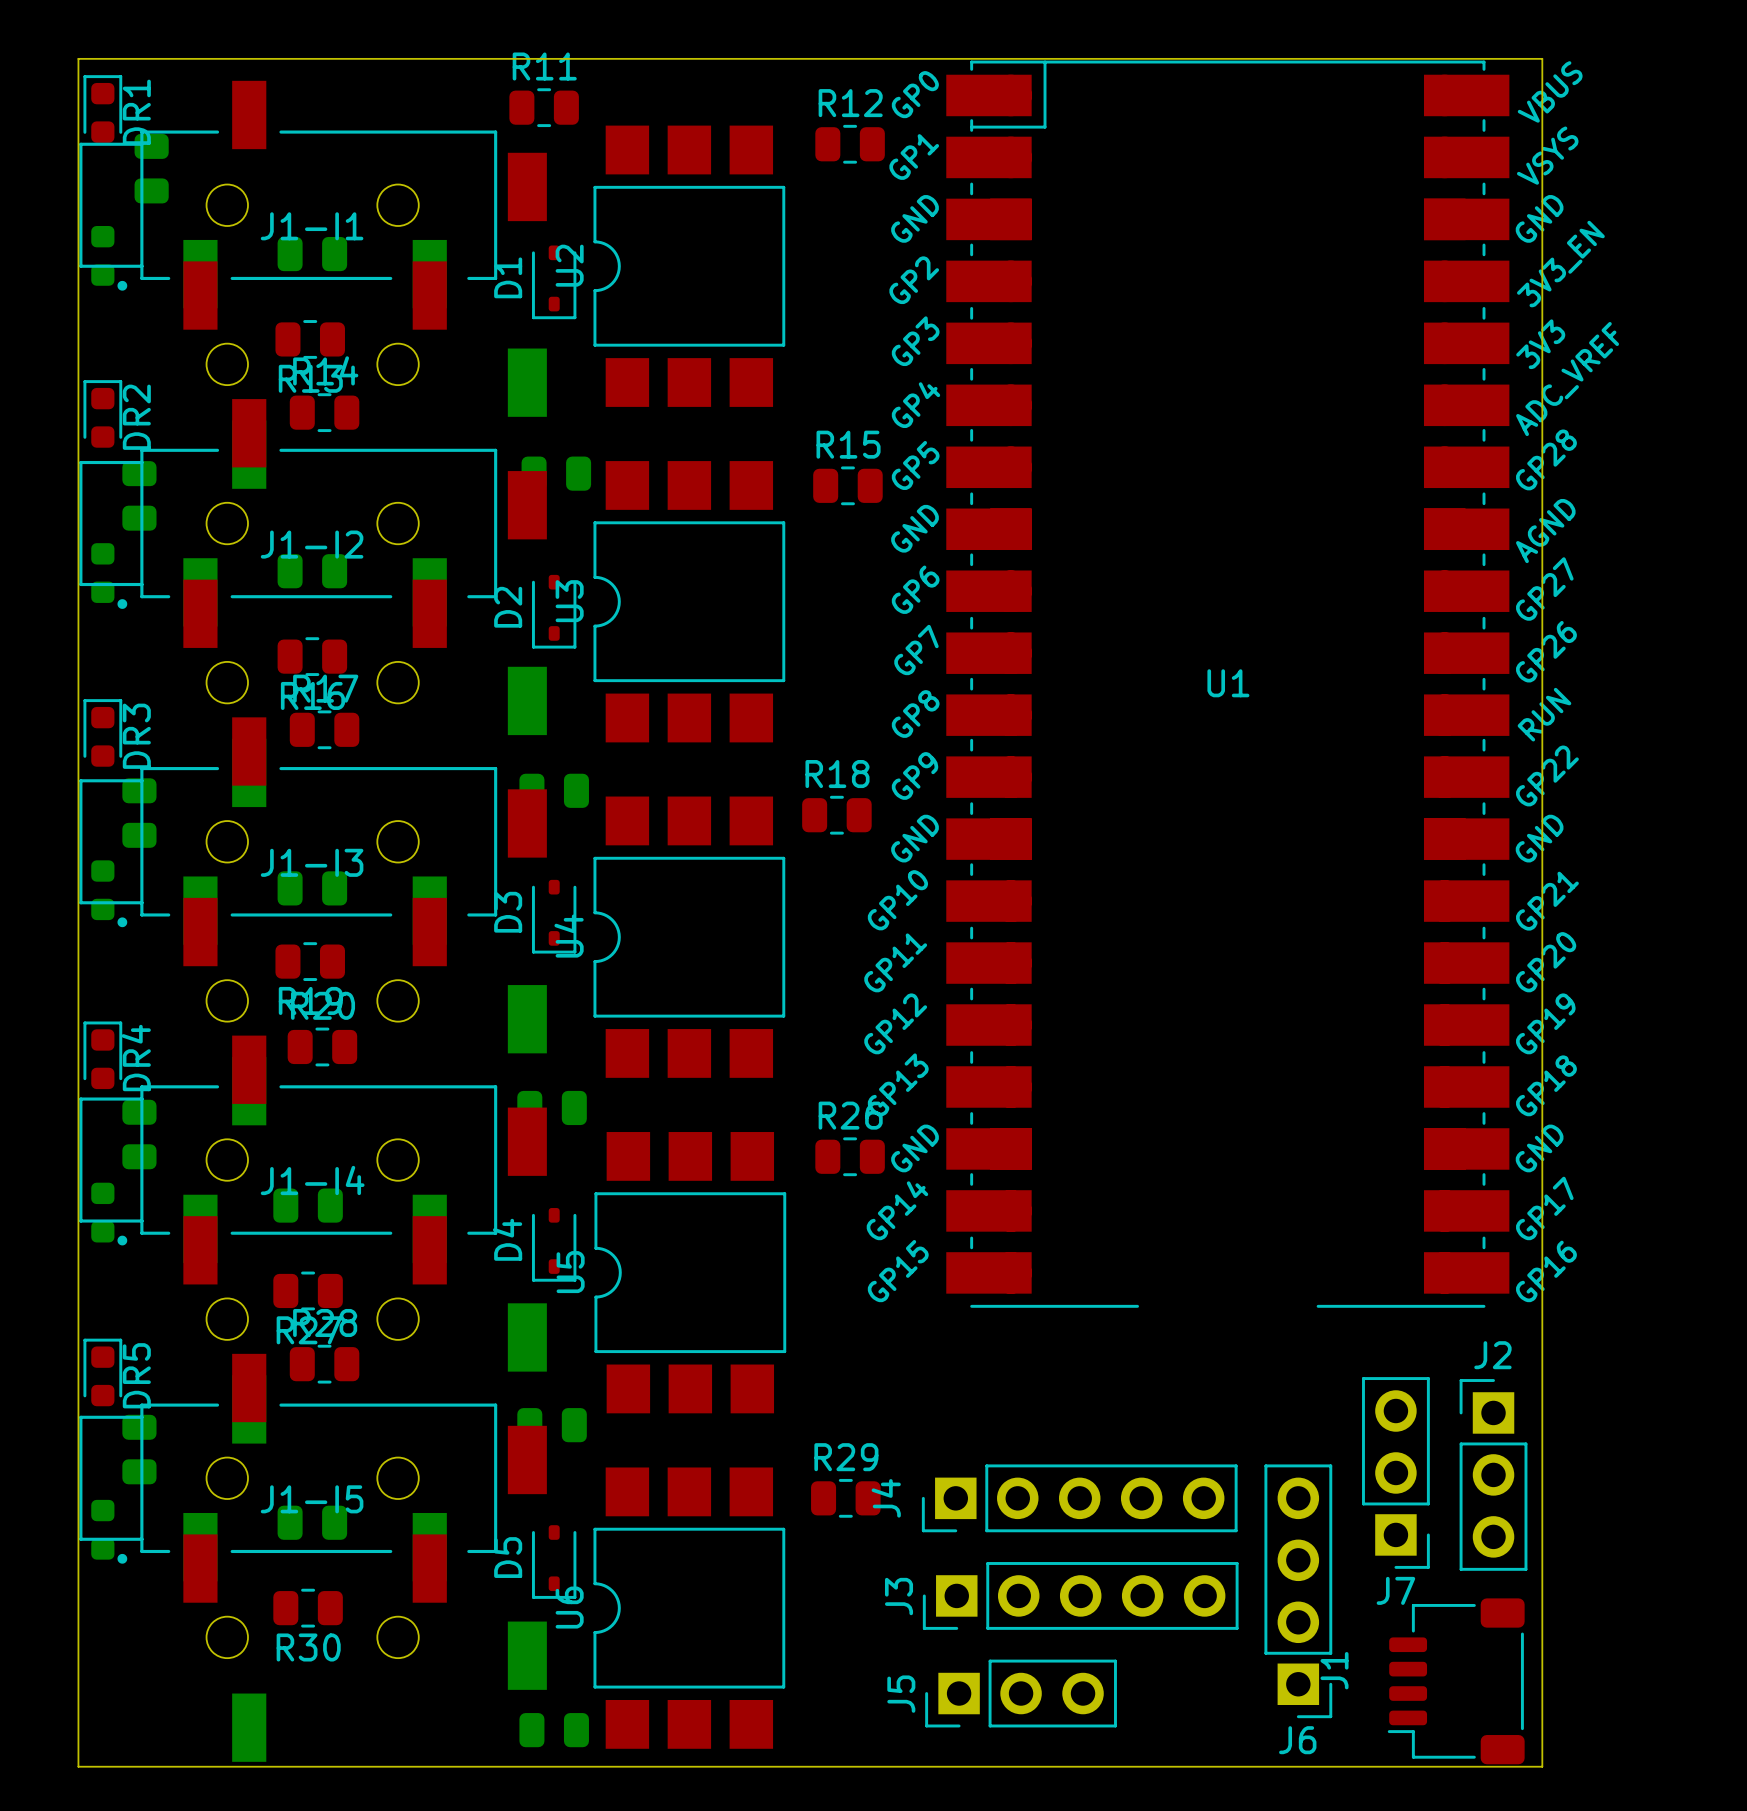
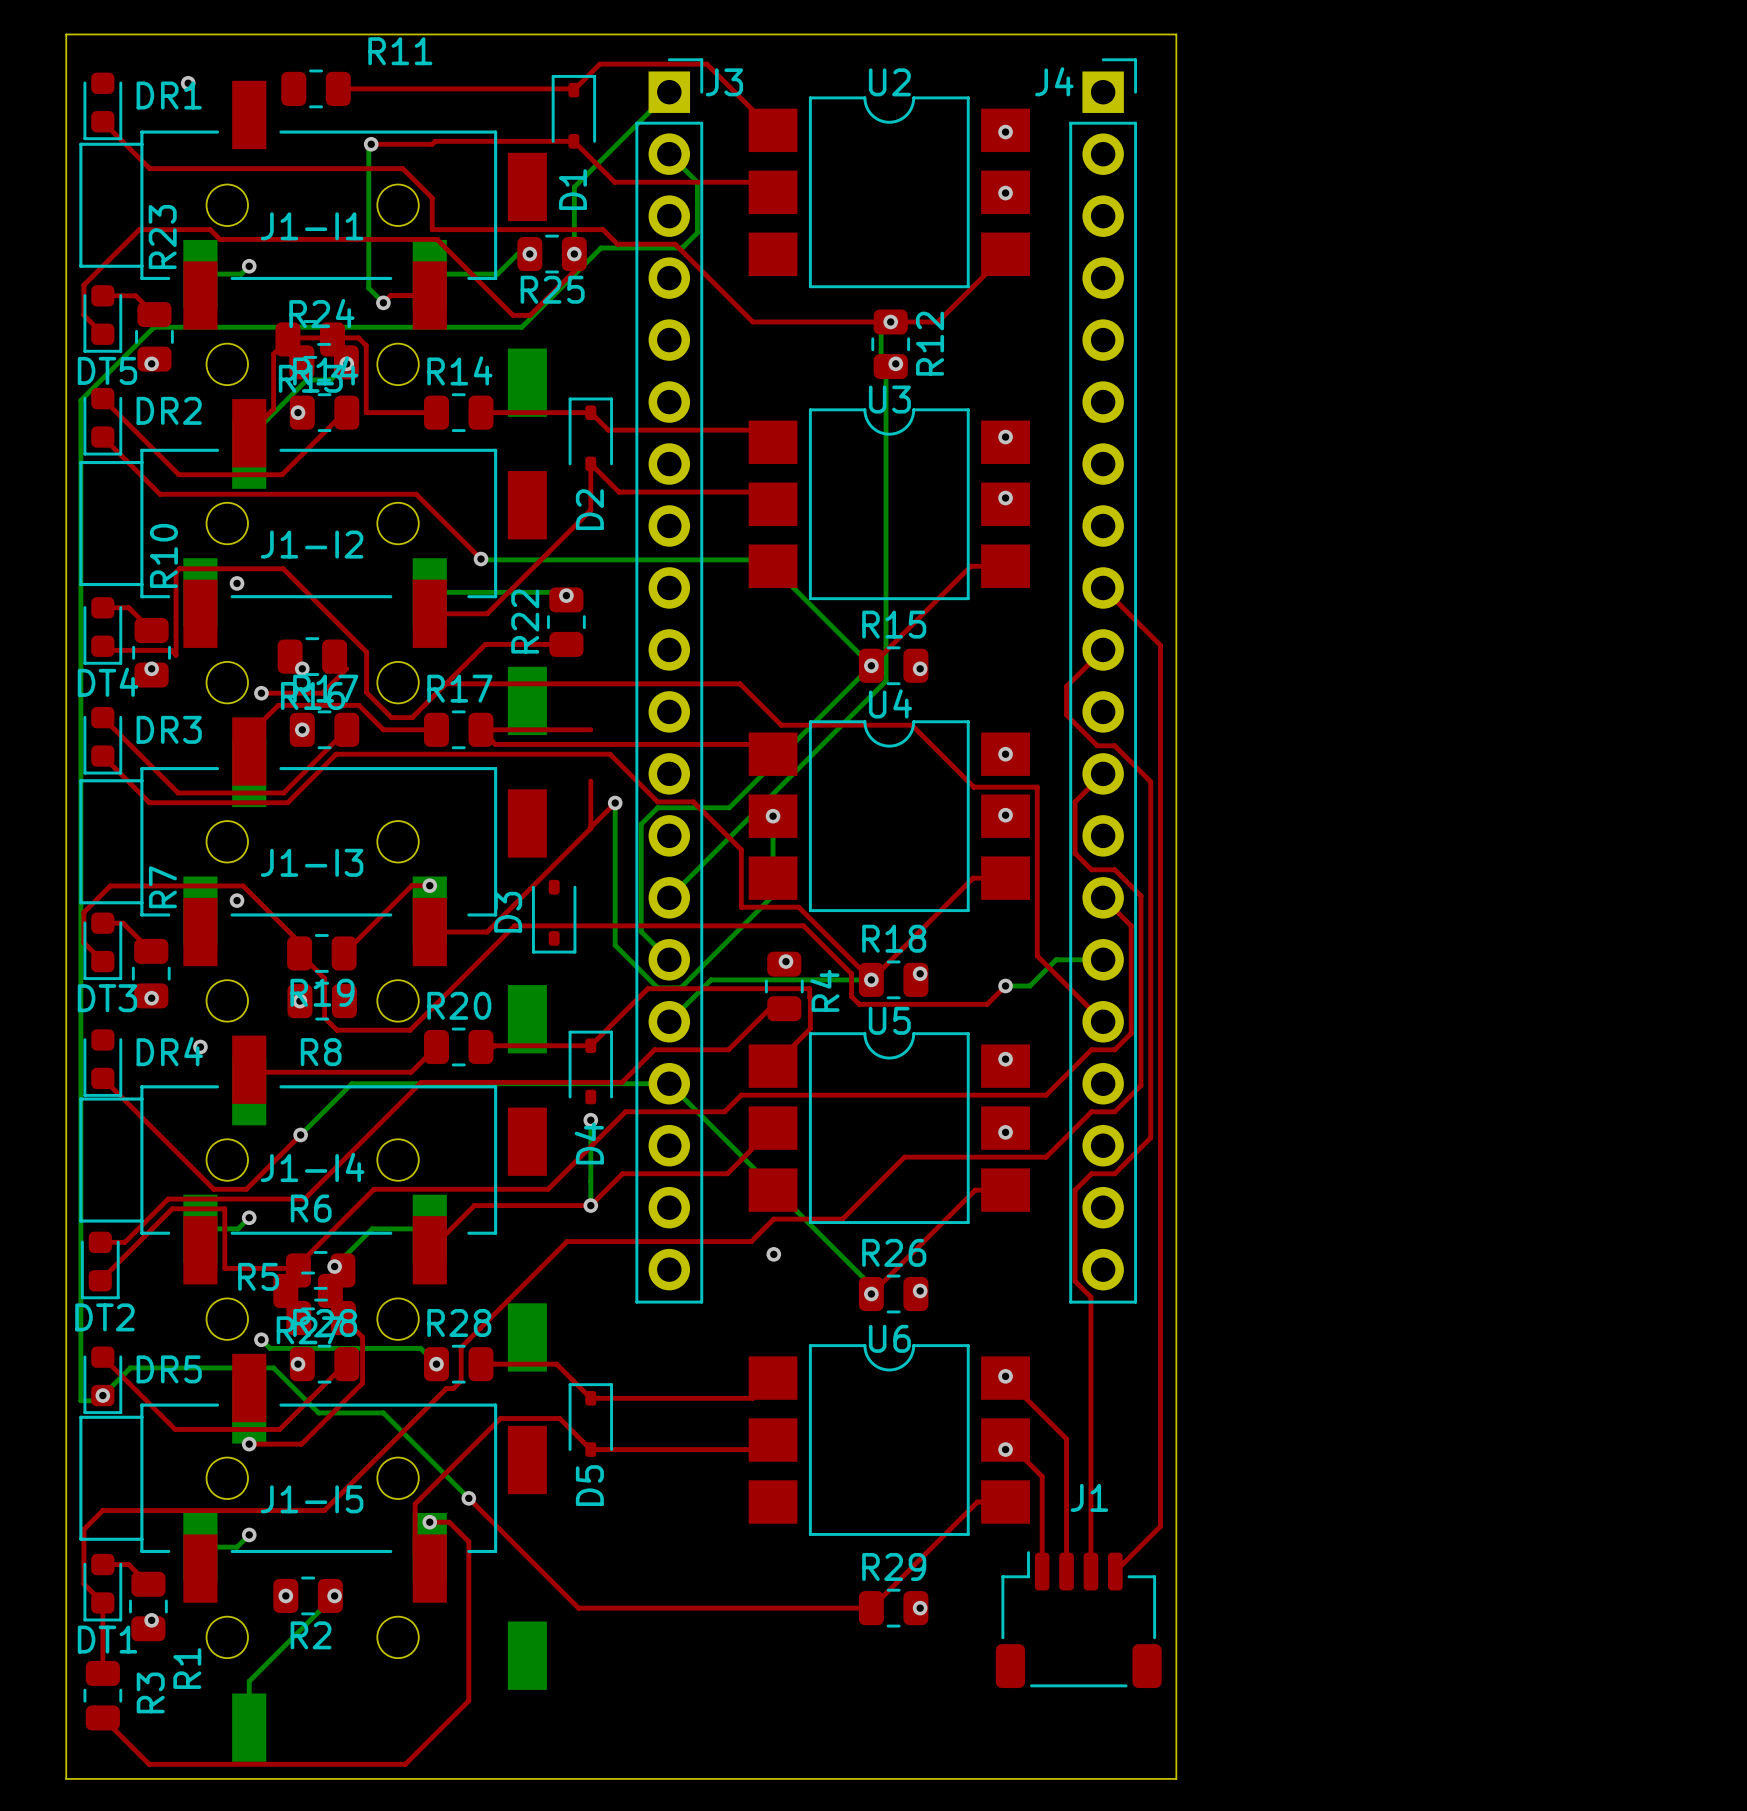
board edge: (78, 58) (1542, 58) (1542, 1766) (78, 1766) (78, 58) -> (66, 34) (66, 1778) (1176, 1778) (1176, 34) (66, 34)
R11 name position: R11 (544, 66) -> R11 (400, 51)
J1-I1 footprint: [79, 80, 547, 330] -> [79, 80, 547, 330]
via: none -> (188, 83)
top track: none -> (338, 88) (573, 90) (599, 64) (706, 64) (773, 130)
bottom track: none -> (669, 92) (574, 187) (574, 254)
R11 position: (544, 107) -> (316, 88)
DR1 rotation: 0° (102, 108) -> 180° (102, 106)
top track: none -> (102, 121) (149, 168) (402, 168) (432, 198) (432, 229) (603, 229) (617, 244) (675, 244) (752, 321) (937, 321) (1005, 254)
via: none -> (1005, 132)
top track: none -> (371, 144) (432, 144) (435, 141) (573, 141) (614, 182) (762, 182) (773, 192)
bottom track: none -> (371, 144) (368, 146) (368, 288) (383, 302)
via: none -> (371, 144)
R12 rotation: 0° (850, 144) -> 90° clockwise (890, 344)
R12 position: (850, 144) -> (890, 344)
bottom track: none -> (669, 154) (697, 182) (697, 232) (682, 247) (601, 247) (521, 327) (154, 327) (80, 400) (80, 1400) (97, 1400) (130, 1367) (273, 1367) (318, 1412) (383, 1412) (468, 1498)
R23 side: bottom (151, 168) -> top (154, 336)
via: none -> (1005, 193)
top track: none -> (574, 246) (574, 271) (530, 315) (513, 315) (437, 239) (220, 239) (210, 229) (139, 229) (83, 285) (83, 315) (102, 334)
R25 side: bottom (312, 254) -> top (552, 254)
bottom track: none -> (529, 254) (517, 254) (497, 274) (429, 274)
via: none -> (529, 254)
via: none -> (574, 254)
DT5 side: bottom (102, 255) -> top (102, 318)
bottom track: none -> (249, 266) (241, 274) (200, 274)
via: none -> (249, 266)
U2 rotation: 0° (689, 266) -> 90° clockwise (889, 192)
U2 position: (689, 266) -> (889, 192)
D1 name position: D1 (508, 277) -> D1 (572, 189)
D1 rotation: 0° (554, 282) -> 180° (573, 111)
D1 position: (554, 282) -> (573, 111)
top track: none -> (102, 295) (135, 295) (154, 314)
top track: none -> (429, 295) (390, 295) (383, 302)
via: none -> (383, 302)
bottom track: none -> (890, 321) (881, 331) (881, 369) (886, 374) (886, 681) (669, 897)
via: none -> (890, 321)
via: none -> (151, 363)
bottom track: none -> (346, 363) (330, 379) (306, 379) (249, 437) (249, 454)
via: none -> (346, 363)
via: none -> (895, 363)
top track: none -> (102, 398) (178, 474) (282, 474) (346, 410)
J1-I2 footprint: [79, 399, 547, 648] -> [79, 399, 547, 648]
via: none -> (298, 412)
top track: none -> (436, 412) (366, 412) (366, 345) (358, 337) (289, 337) (273, 354) (273, 408) (249, 433)
R14: none -> (458, 412)
top track: none -> (481, 412) (590, 412) (608, 430) (760, 430) (773, 442)
DR2 rotation: 0° (102, 413) -> 180° (102, 421)
top track: none -> (102, 437) (160, 494) (416, 494) (481, 559)
via: none -> (1005, 437)
R24 side: bottom (556, 473) -> top (324, 362)
R15 position: (847, 485) -> (893, 665)
R10 side: bottom (139, 495) -> top (151, 652)
via: none -> (1005, 498)
top track: none -> (773, 504) (760, 492) (618, 492) (590, 463) (590, 510) (487, 613) (429, 613)
bottom track: none -> (481, 559) (765, 559) (871, 665) (729, 807) (657, 807) (641, 824) (641, 931) (669, 959)
via: none -> (481, 559)
top track: none -> (1005, 566) (970, 566) (871, 665)
R22 side: bottom (312, 571) -> top (566, 622)
DT4 side: bottom (102, 573) -> top (102, 630)
via: none -> (237, 583)
top track: none -> (1103, 587) (1160, 645) (1160, 1526) (1115, 1571)
bottom track: none -> (429, 592) (563, 592) (566, 595)
via: none -> (566, 595)
U3 rotation: 0° (689, 601) -> 90° clockwise (889, 504)
U3 position: (689, 601) -> (889, 504)
top track: none -> (102, 607) (128, 607) (151, 630)
D2 name position: D2 (508, 607) -> D2 (589, 509)
D2 rotation: 0° (554, 611) -> 180° (590, 434)
D2 position: (554, 611) -> (590, 434)
top track: none -> (566, 644) (485, 644) (412, 717) (391, 717) (366, 692) (366, 652) (283, 568) (179, 568) (176, 572) (176, 655) (171, 650) (106, 650) (102, 646)
top track: none -> (1103, 649) (1066, 686) (1066, 715) (1097, 745) (1114, 745) (1150, 781) (1150, 1137) (1114, 1173) (1091, 1173) (1075, 1190) (1075, 1281) (1090, 1297) (1090, 1571)
via: none -> (871, 665)
via: none -> (151, 668)
via: none -> (302, 668)
top track: none -> (346, 668) (322, 693) (261, 693)
via: none -> (920, 668)
top track: none -> (445, 683) (740, 683) (781, 725) (911, 725) (973, 787) (1037, 787) (1037, 955) (1103, 1021)
U1: (1227, 684) -> none
via: none -> (261, 693)
J1-I3 footprint: [79, 717, 547, 967] -> [79, 717, 547, 967]
top track: none -> (102, 717) (178, 792) (283, 792) (346, 729)
via: none -> (302, 729)
top track: none -> (436, 729) (383, 729) (358, 705) (278, 705) (249, 734) (249, 751)
R17: none -> (458, 729)
top track: none -> (590, 729) (481, 729) (495, 744) (763, 744) (773, 754)
DR3 rotation: 0° (102, 732) -> 180° (102, 740)
via: none -> (1005, 754)
top track: none -> (102, 756) (149, 802) (287, 802) (336, 754) (609, 754) (657, 801) (693, 801) (741, 849) (741, 907) (798, 907) (871, 979) (973, 878) (1005, 878)
top track: none -> (1103, 773) (1075, 801) (1075, 853) (1091, 869) (1114, 869) (1140, 895) (1140, 1085) (1114, 1111) (1091, 1111) (1046, 1157) (904, 1157) (842, 1219) (773, 1219) (751, 1241) (567, 1241) (461, 1347) (461, 1380) (453, 1388) (446, 1388) (324, 1510) (102, 1510) (83, 1529) (83, 1584) (102, 1602) (102, 1673)
top track: none -> (590, 781) (590, 828) (487, 932) (429, 932)
part: (554, 790) -> none
top track: none -> (615, 803) (590, 827)
bottom track: none -> (615, 803) (615, 945) (657, 987) (680, 987) (773, 895) (773, 816)
via: none -> (615, 803)
R7 side: bottom (139, 813) -> top (151, 973)
R18 position: (836, 815) -> (893, 979)
via: none -> (1005, 815)
via: none -> (773, 816)
top track: none -> (429, 885) (411, 885) (344, 953)
via: none -> (429, 885)
part: (312, 888) -> none
DT3 side: bottom (102, 890) -> top (102, 946)
top track: none -> (1103, 897) (1131, 925) (1131, 1033) (1114, 1049) (1091, 1049) (1046, 1095) (741, 1095) (724, 1111) (625, 1111) (548, 1189) (373, 1189) (294, 1268) (224, 1268) (224, 1208) (172, 1208) (100, 1280)
via: none -> (237, 900)
top track: none -> (102, 923) (123, 923) (151, 951)
U4 rotation: 0° (689, 937) -> 90° clockwise (889, 816)
U4 position: (689, 937) -> (889, 816)
bottom track: none -> (1103, 959) (1056, 959) (1029, 985) (1005, 985)
top track: none -> (102, 961) (83, 942) (83, 912) (110, 885) (243, 885) (299, 942) (299, 953) (324, 978) (324, 1017) (336, 1030) (410, 1030) (514, 925) (803, 925) (851, 973) (851, 996) (859, 1004) (987, 1004) (1005, 985)
R19 position: (310, 961) -> (321, 953)
via: none -> (785, 961)
via: none -> (920, 973)
bottom track: none -> (871, 979) (711, 979) (669, 1021)
via: none -> (871, 979)
via: none -> (1005, 985)
R4: none -> (784, 986)
via: none -> (151, 998)
via: none -> (299, 1001)
top track: none -> (785, 1010) (768, 1010) (728, 1049) (654, 1049) (622, 1082) (421, 1082) (304, 1199) (168, 1199) (124, 1242) (100, 1242)
J1-I4 footprint: [79, 1035, 547, 1285] -> [79, 1035, 547, 1285]
via: none -> (200, 1046)
R20 position: (322, 1046) -> (458, 1046)
top track: none -> (436, 1046) (411, 1072) (251, 1072) (249, 1069)
top track: none -> (481, 1046) (590, 1045) (647, 988) (809, 988) (810, 1028) (773, 1066)
DR4 rotation: 0° (102, 1055) -> 180° (102, 1063)
via: none -> (1005, 1059)
top track: none -> (102, 1078) (213, 1189) (246, 1189) (300, 1134)
R8 side: bottom (552, 1107) -> top (322, 1001)
bottom track: none -> (590, 1120) (590, 1205)
via: none -> (590, 1120)
top track: none -> (773, 1128) (727, 1173) (622, 1173) (590, 1205) (474, 1205) (429, 1250)
via: none -> (1005, 1132)
part: (139, 1134) -> none
bottom track: none -> (300, 1134) (351, 1083) (669, 1083) (871, 1285) (871, 1294)
via: none -> (300, 1134)
R26 position: (850, 1156) -> (893, 1294)
J1-I4 name position: J1-I4 (312, 1180) -> J1-I4 (312, 1167)
top track: none -> (1005, 1190) (975, 1190) (871, 1294)
R6 side: bottom (308, 1205) -> top (320, 1270)
via: none -> (590, 1205)
DT2 side: bottom (102, 1212) -> top (100, 1265)
bottom track: none -> (249, 1217) (238, 1228) (200, 1228)
via: none -> (249, 1217)
bottom track: none -> (429, 1228) (372, 1228) (334, 1266)
D4 name position: D4 (507, 1239) -> D4 (589, 1143)
D4 rotation: 0° (554, 1244) -> 180° (590, 1067)
D4 position: (554, 1244) -> (590, 1067)
via: none -> (773, 1254)
via: none -> (334, 1266)
U5 rotation: 0° (690, 1272) -> 90° clockwise (889, 1128)
U5 position: (690, 1272) -> (889, 1128)
via: none -> (920, 1290)
via: none -> (871, 1294)
top track: none -> (343, 1318) (362, 1337) (362, 1383) (301, 1444) (249, 1444)
bottom track: none -> (261, 1339) (270, 1348) (420, 1348) (436, 1364)
via: none -> (261, 1339)
J1-I5 footprint: [79, 1353, 547, 1603] -> [79, 1353, 547, 1603]
top track: none -> (102, 1357) (175, 1429) (279, 1429) (342, 1366)
via: none -> (298, 1364)
via: none -> (436, 1364)
R28: none -> (458, 1364)
top track: none -> (481, 1364) (556, 1364) (590, 1398) (752, 1398) (773, 1378)
DR5 rotation: 0° (102, 1372) -> 180° (102, 1380)
top track: none -> (1005, 1376) (1066, 1439) (1066, 1571)
via: none -> (1005, 1376)
via: none -> (102, 1395)
R5 side: bottom (552, 1425) -> top (321, 1318)
top track: none -> (773, 1440) (763, 1449) (590, 1449) (559, 1418) (500, 1418) (415, 1503) (415, 1553) (429, 1568)
via: none -> (249, 1444)
R1 side: bottom (139, 1449) -> top (148, 1606)
top track: none -> (1005, 1449) (1005, 1440) (1042, 1476) (1042, 1571)
via: none -> (1005, 1449)
J4 footprint: [921, 1464, 1238, 1533] -> [1069, 58, 1138, 1304]
J7: (1395, 1472) -> none
J2: (1493, 1474) -> none
top track: none -> (468, 1498) (578, 1608) (871, 1608) (977, 1502) (1005, 1502)
via: none -> (468, 1498)
R29 position: (845, 1498) -> (893, 1608)
J4 name position: J4 (886, 1498) -> J4 (1054, 81)
R3 side: bottom (312, 1522) -> top (102, 1695)
top track: none -> (429, 1522) (449, 1522) (468, 1541) (468, 1700) (405, 1764) (149, 1764) (102, 1717)
via: none -> (429, 1522)
DT1 side: bottom (102, 1529) -> top (102, 1587)
bottom track: none -> (249, 1534) (237, 1547) (200, 1547)
via: none -> (249, 1534)
D5 name position: D5 (508, 1557) -> D5 (589, 1485)
D5 rotation: 0° (554, 1562) -> 180° (590, 1420)
D5 position: (554, 1562) -> (590, 1420)
J3 footprint: [922, 1562, 1239, 1630] -> [635, 58, 704, 1304]
top track: none -> (102, 1564) (128, 1564) (148, 1584)
J6: (1298, 1591) -> none
via: none -> (285, 1595)
bottom track: none -> (334, 1595) (249, 1681) (249, 1727)
via: none -> (334, 1595)
J3 name position: J3 (899, 1596) -> J3 (724, 82)
R30 position: (308, 1608) -> (308, 1595)
U6 rotation: 0° (689, 1608) -> 90° clockwise (889, 1440)
U6 position: (689, 1608) -> (889, 1440)
via: none -> (920, 1608)
via: none -> (151, 1620)
R30 name: R30 (308, 1647) -> R2 (311, 1635)
J1 rotation: 0° (1456, 1681) -> 90° clockwise (1078, 1619)
J1 position: (1456, 1681) -> (1078, 1619)
J5: (1021, 1693) -> none
part: (554, 1730) -> none

